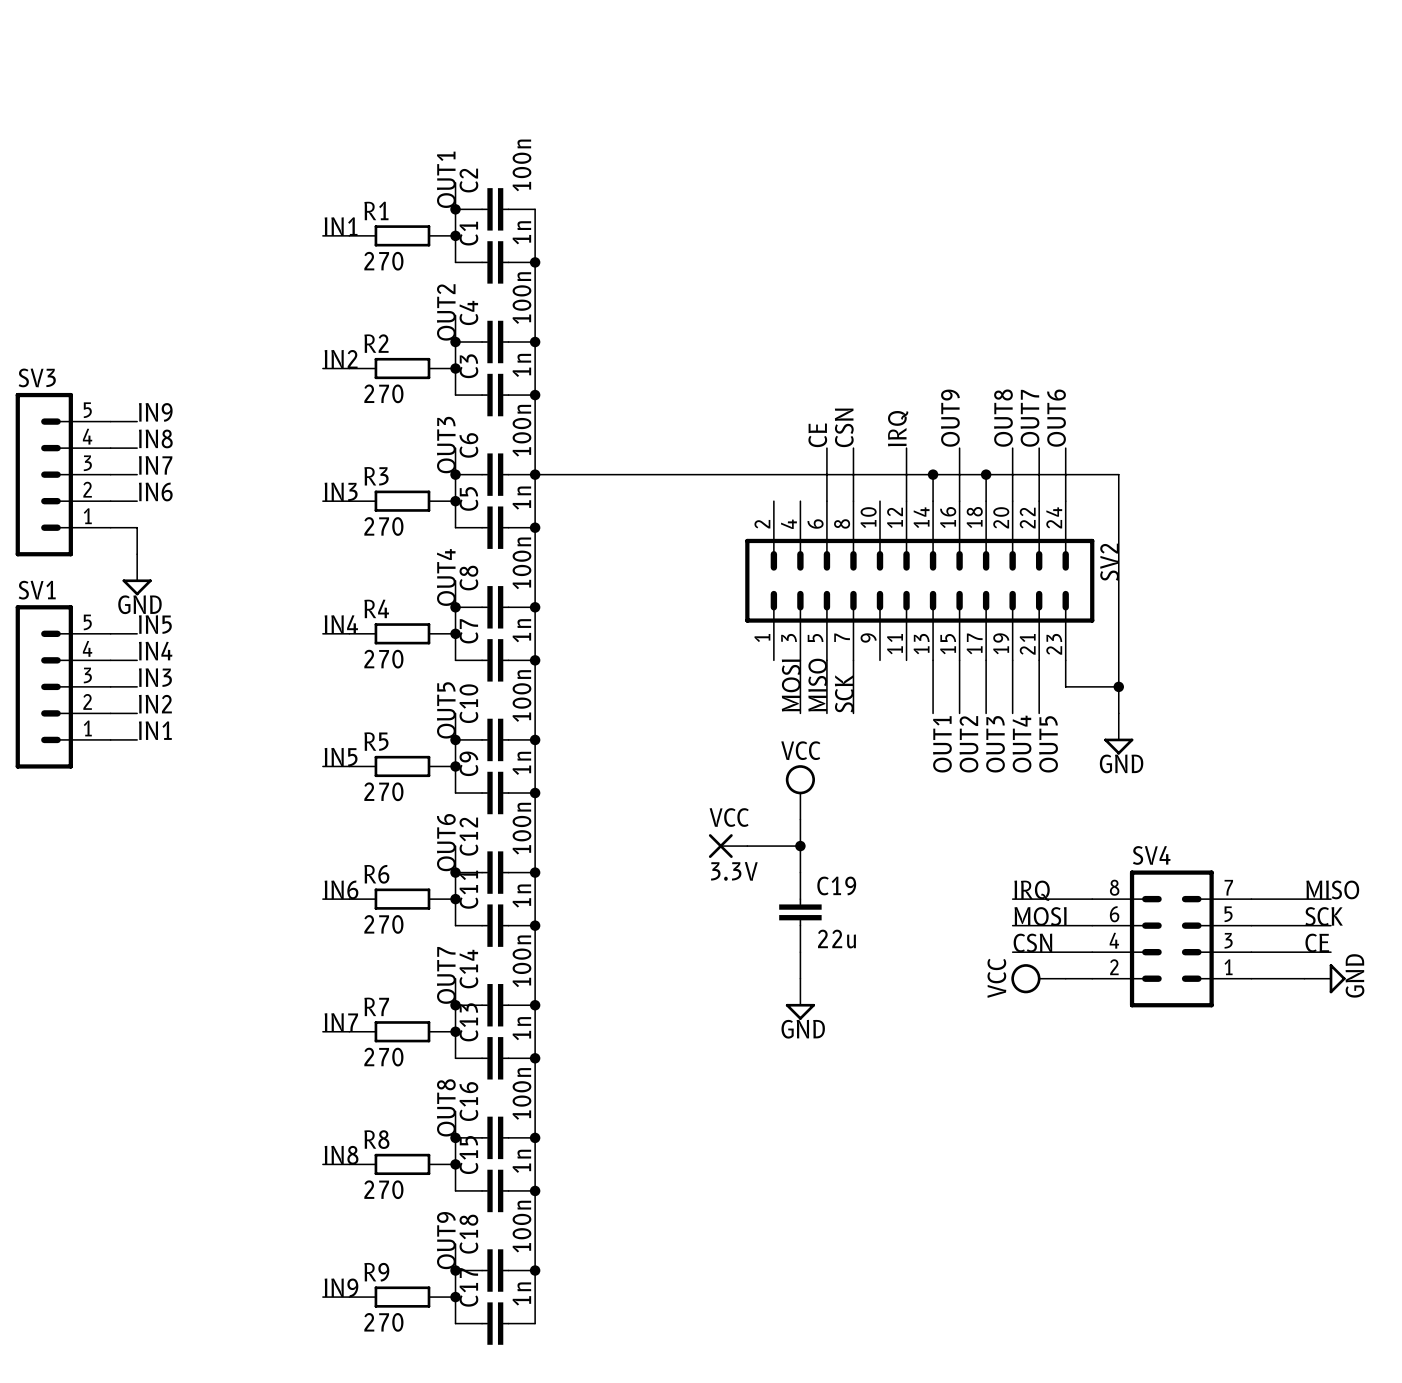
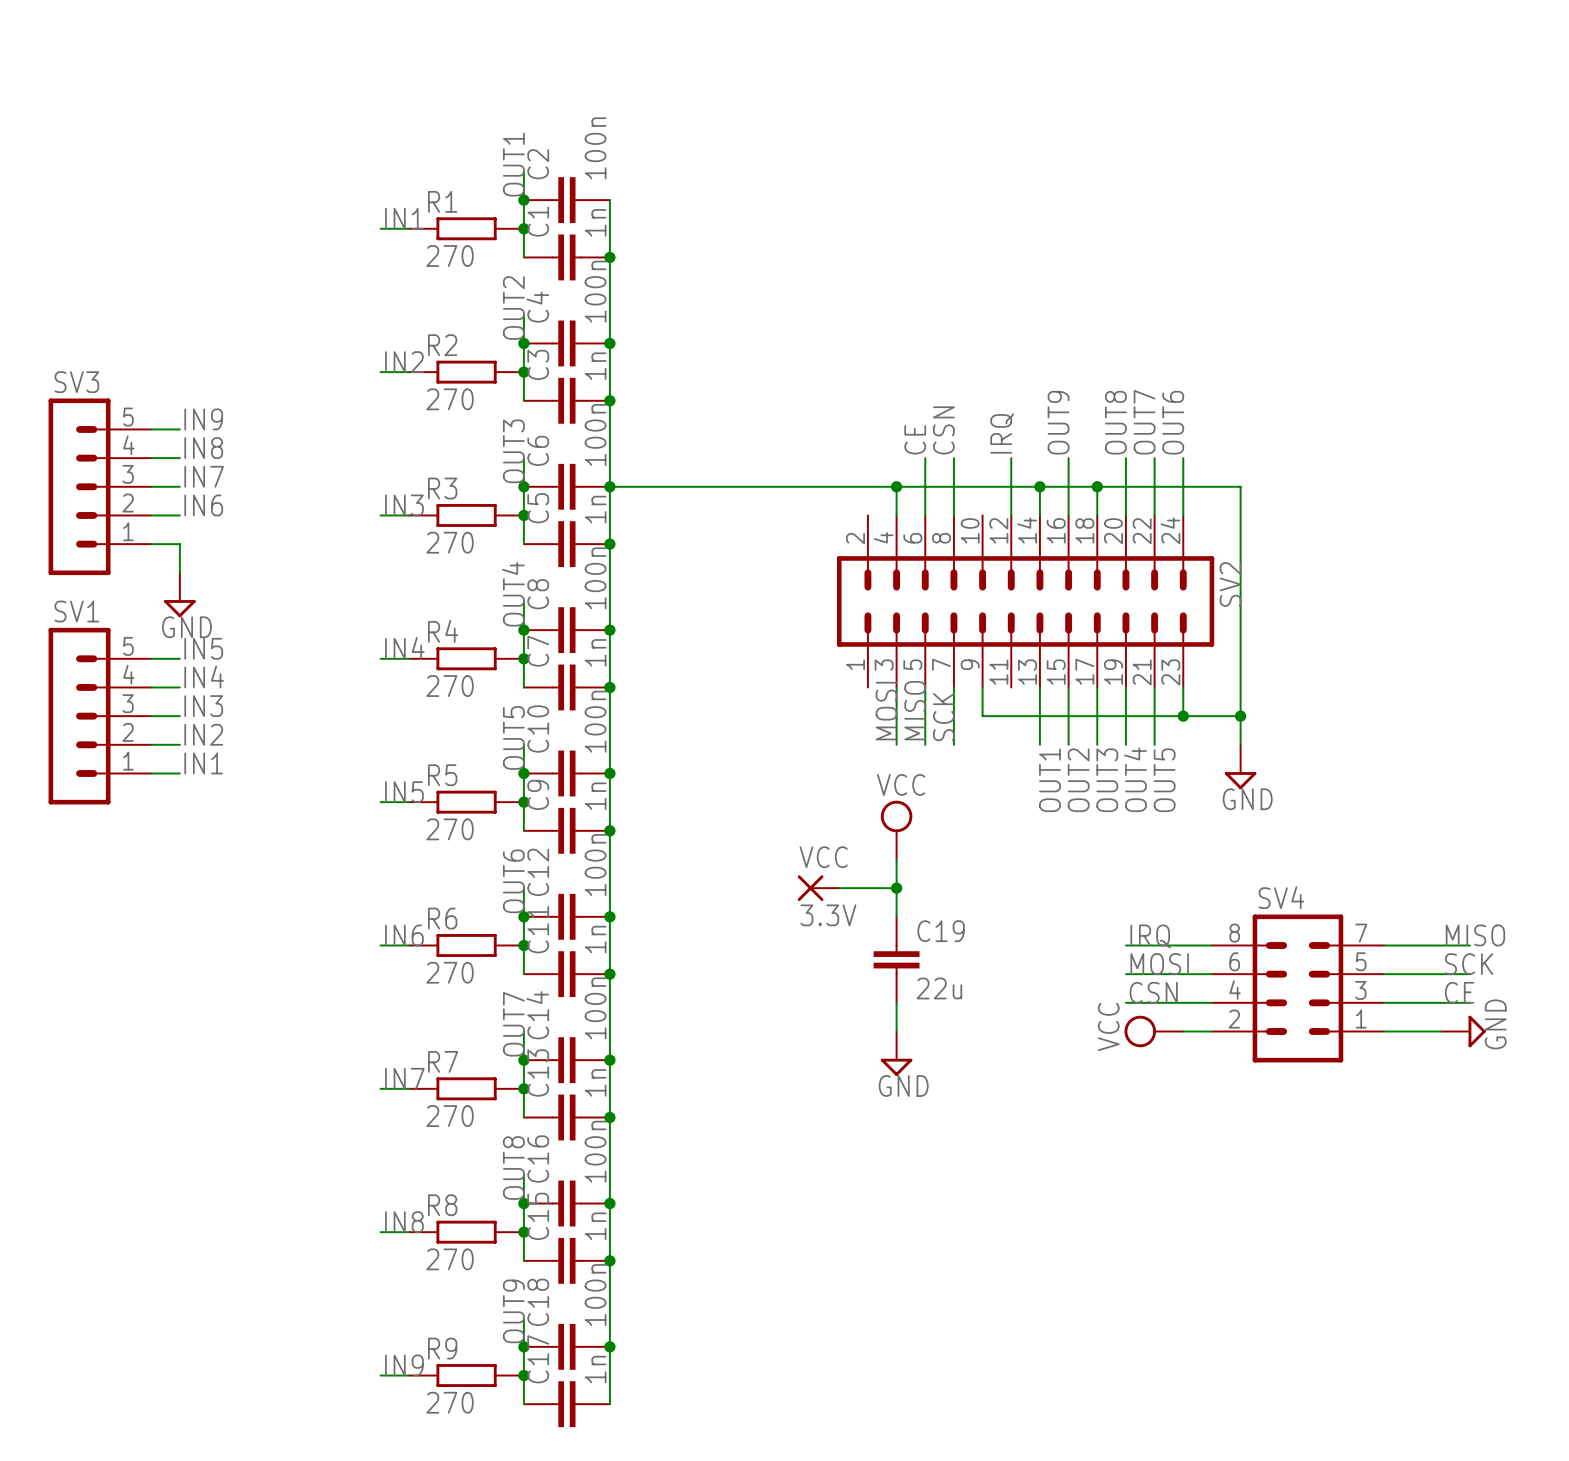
wire: none -> (896, 486) (896, 515)
junction: none -> (896, 486)
wire: none -> (982, 687) (982, 716) (1183, 716)
junction: none -> (1183, 716)

